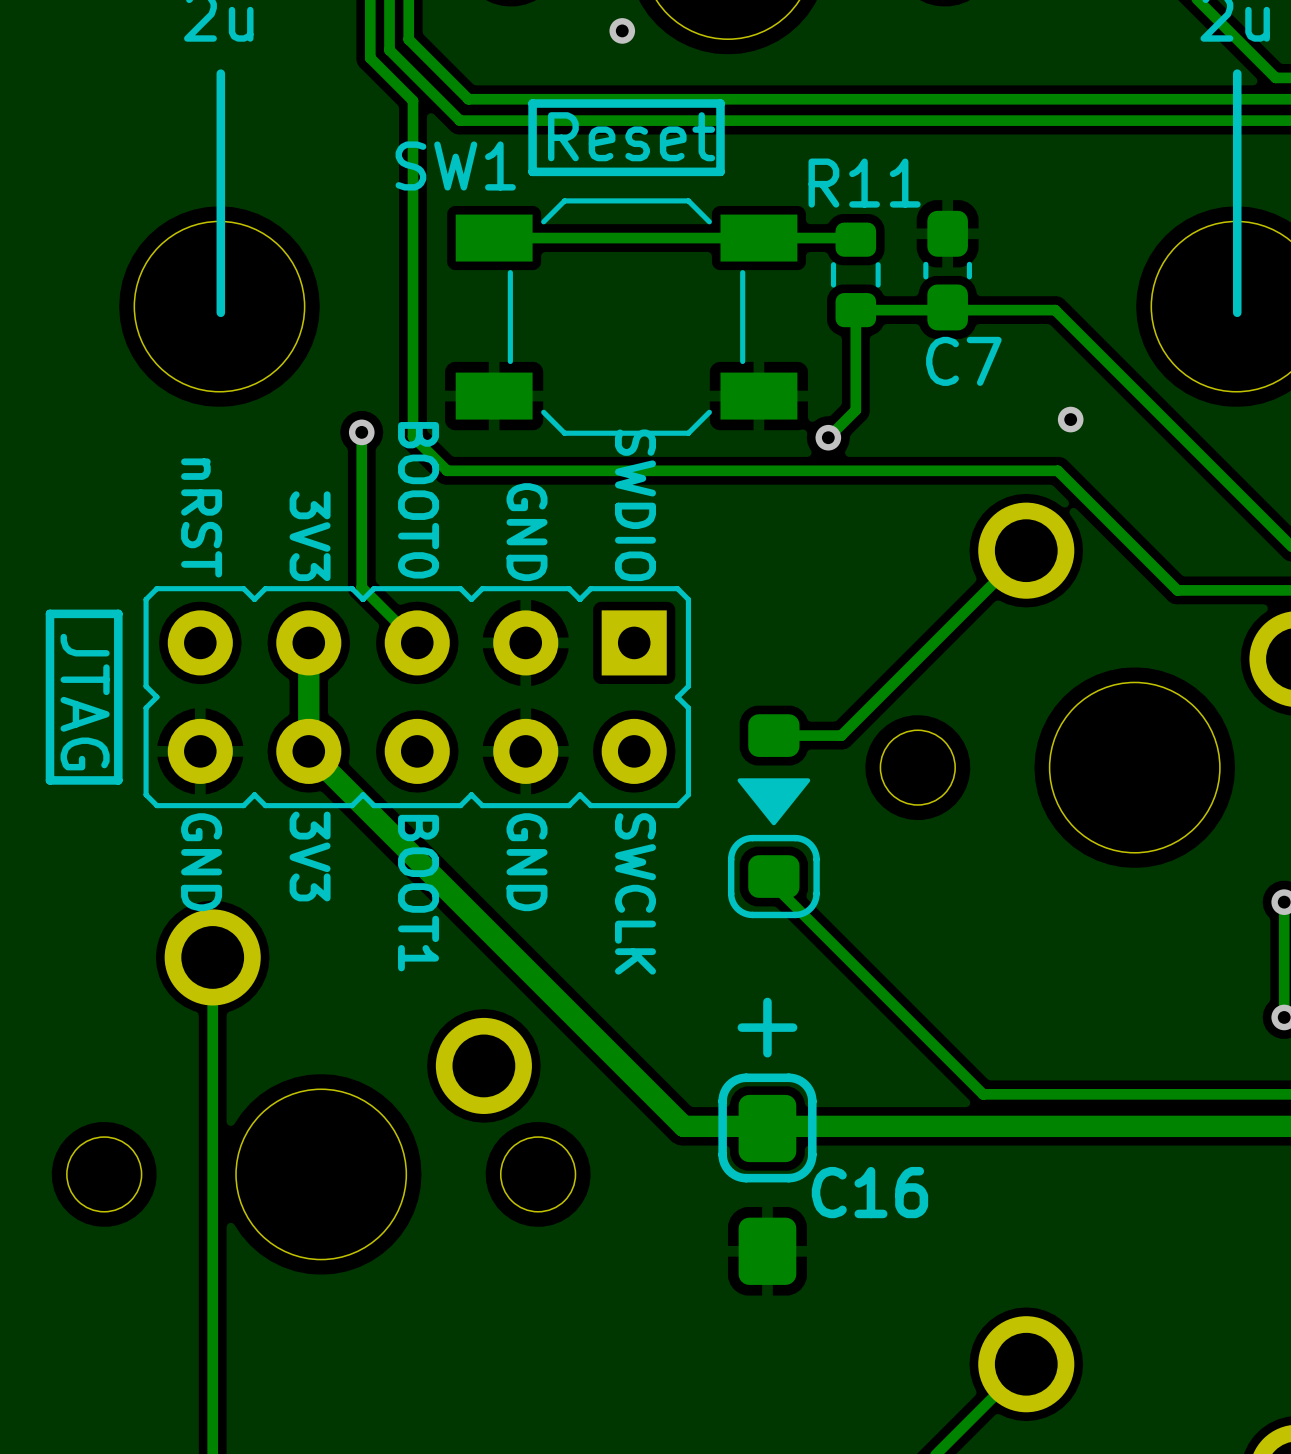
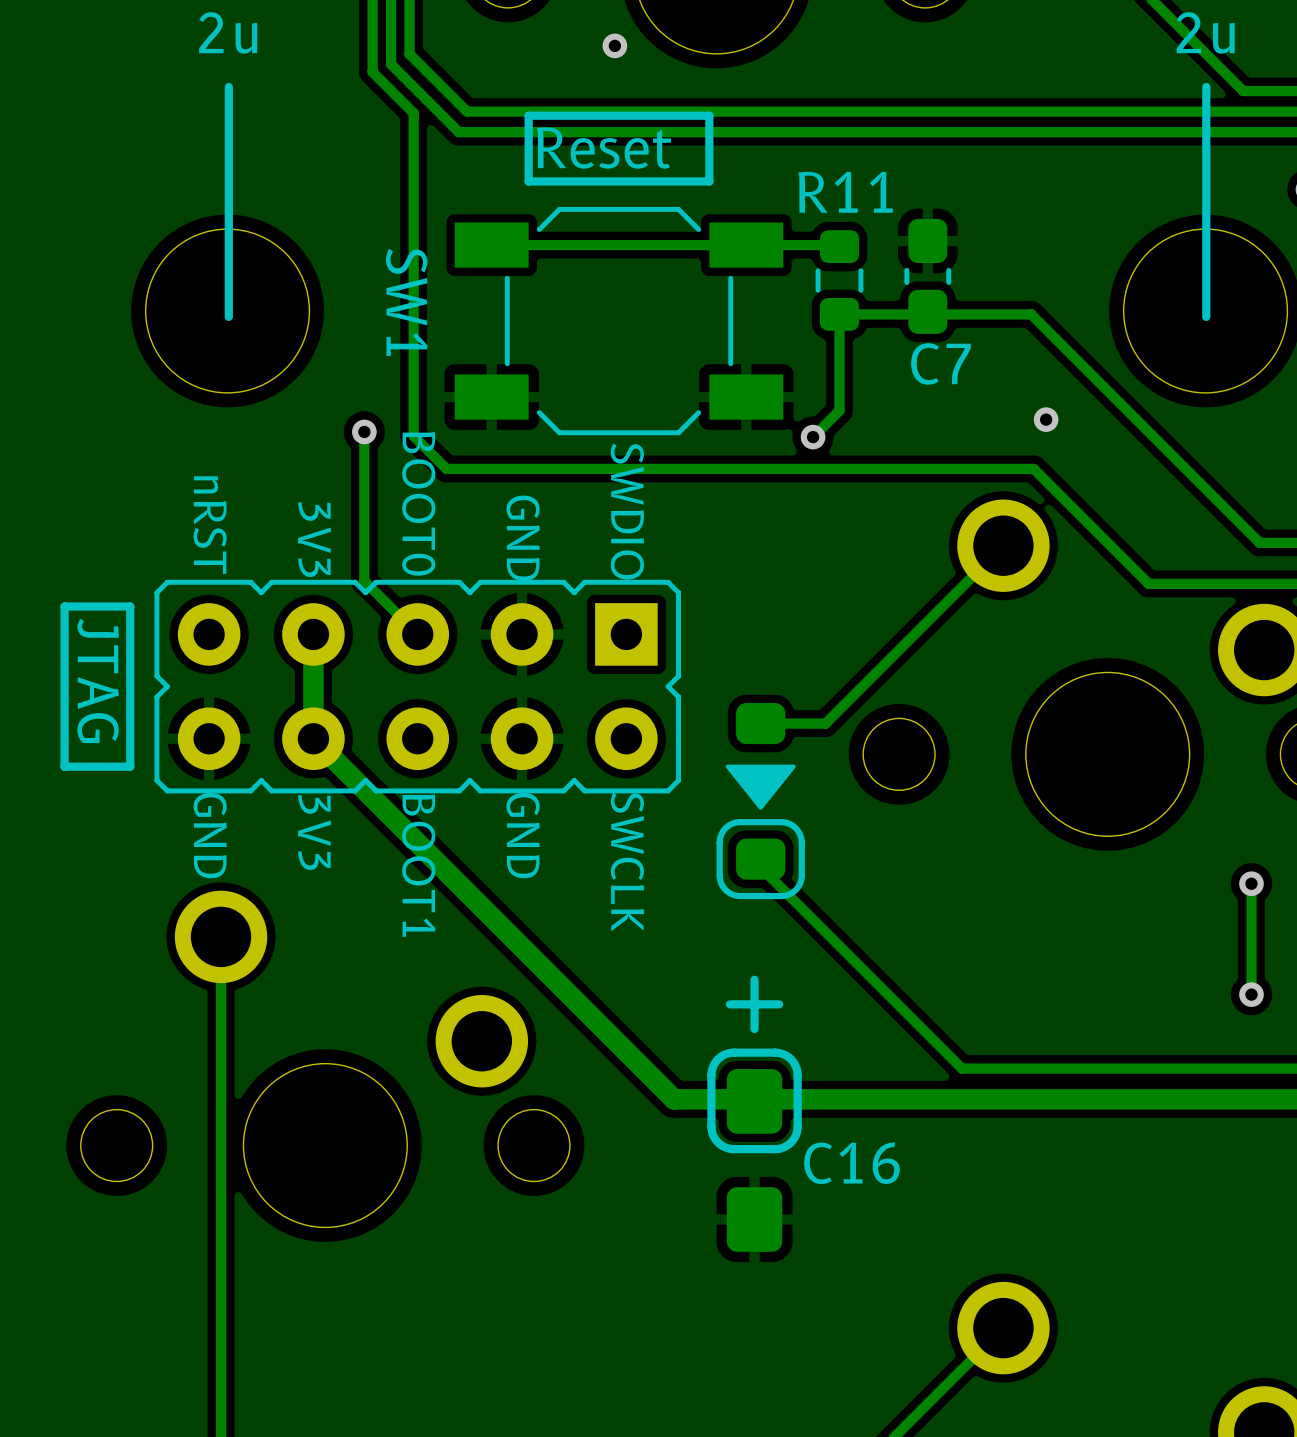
SW1 name rotation: 0° (455, 165) -> 90° clockwise (406, 302)

